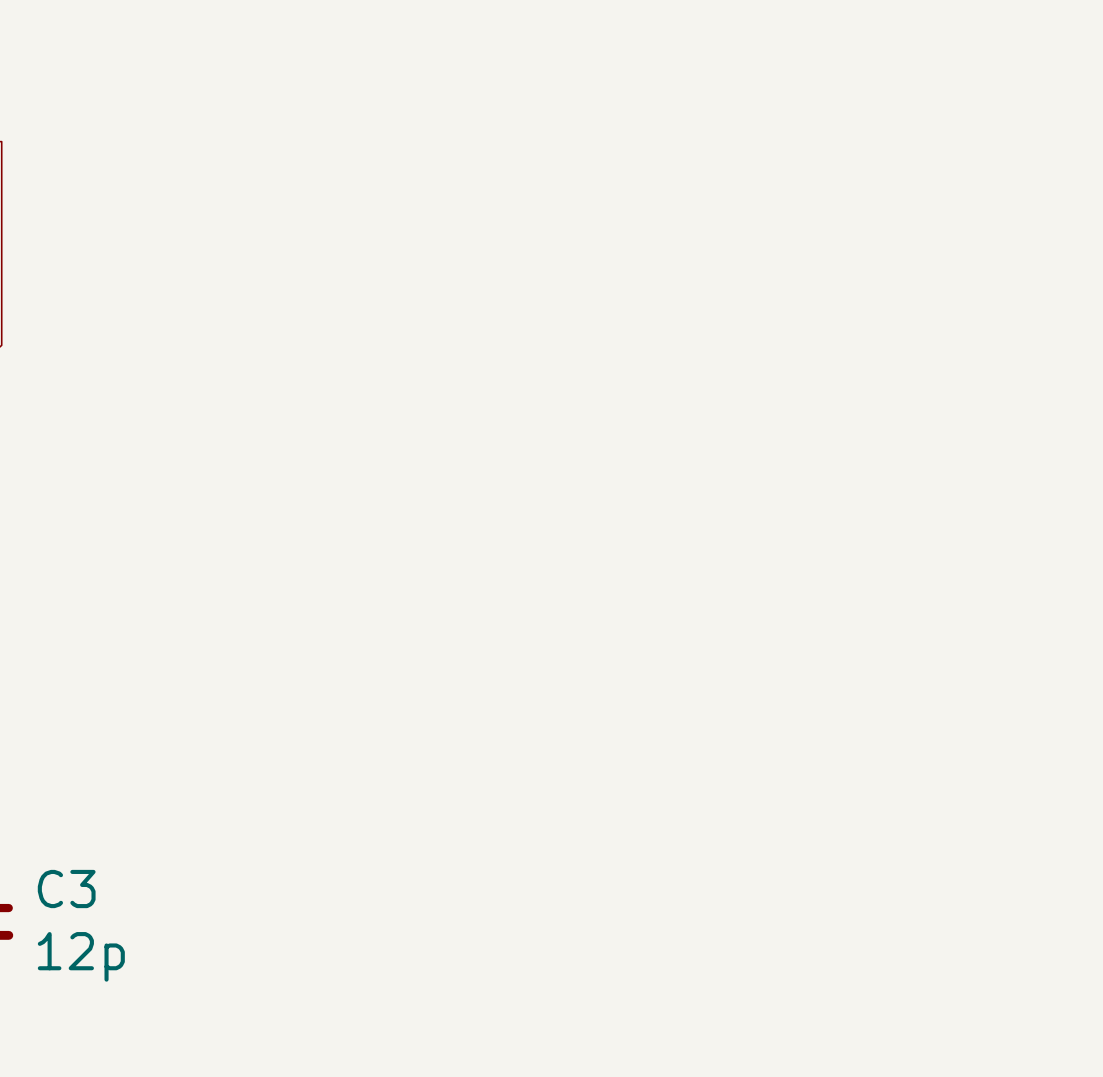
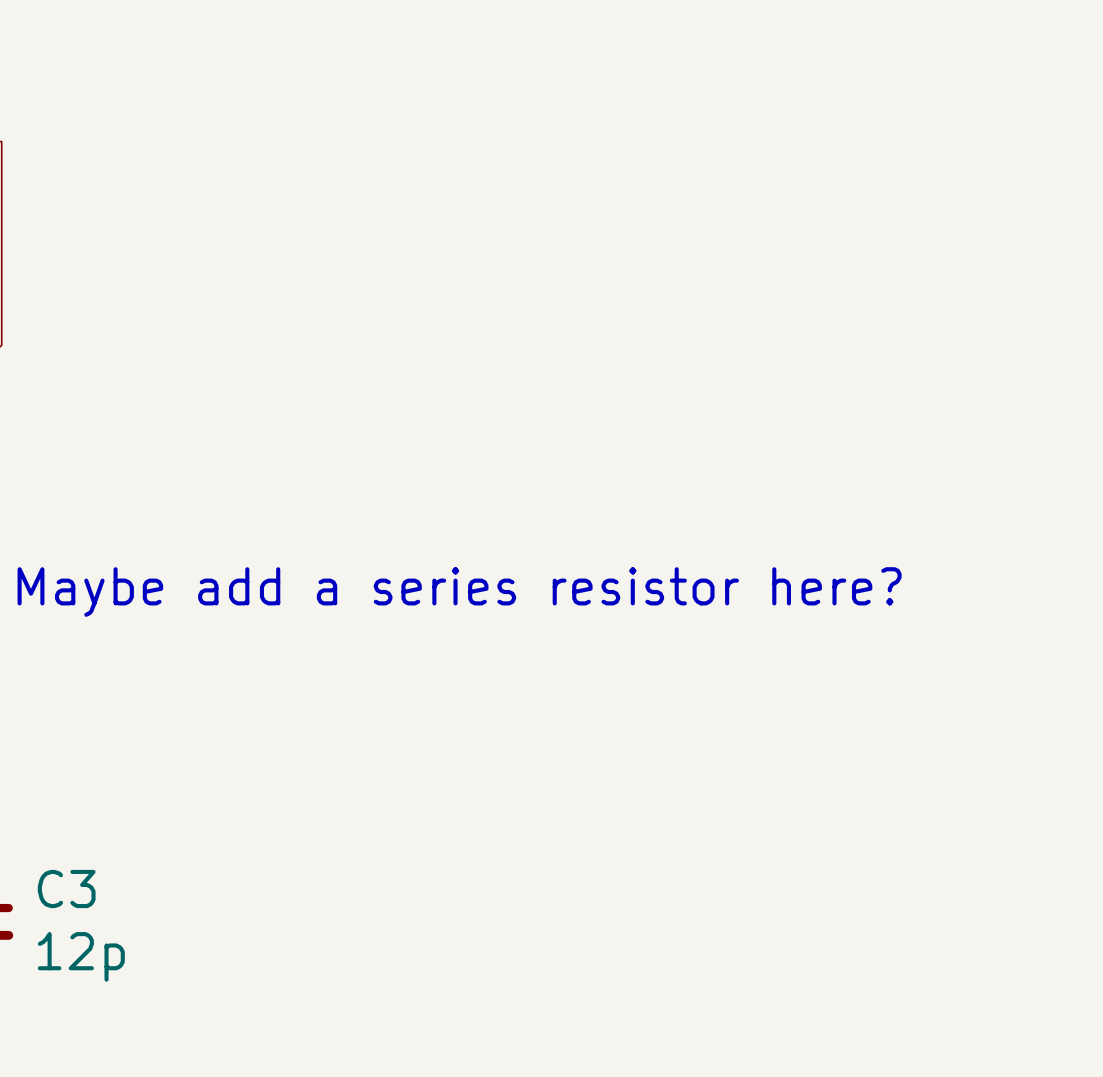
text: none -> Maybe add a series resistor here? (459, 592)

